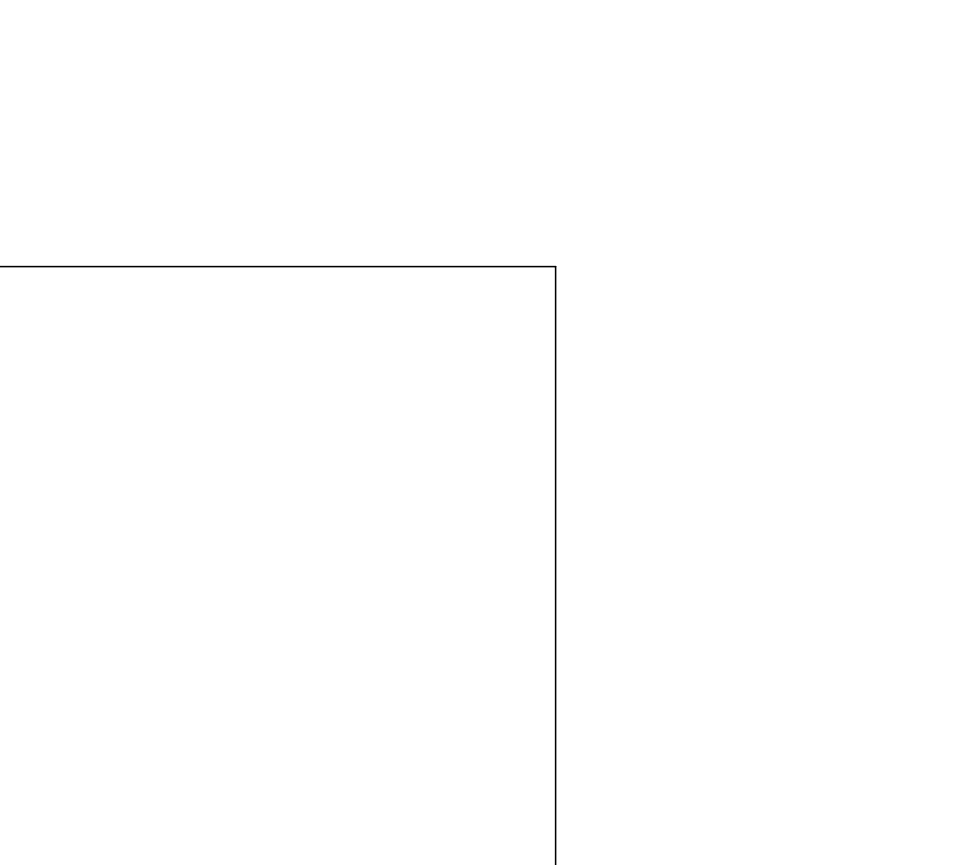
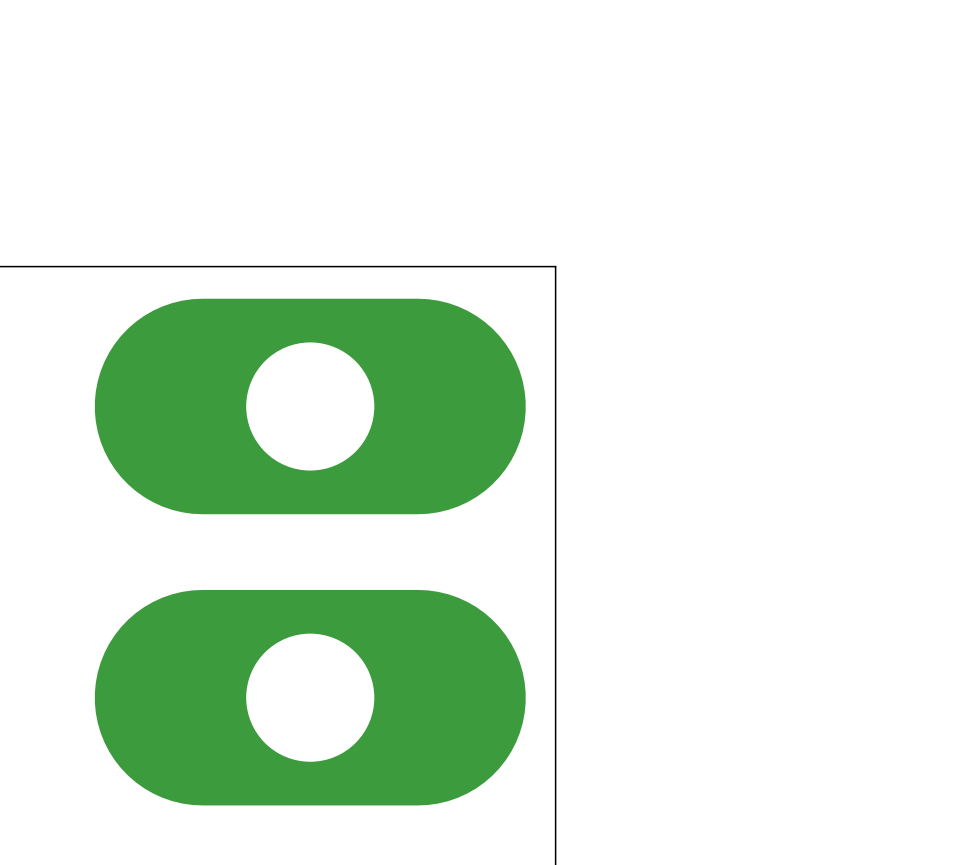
part: none -> (310, 552)

